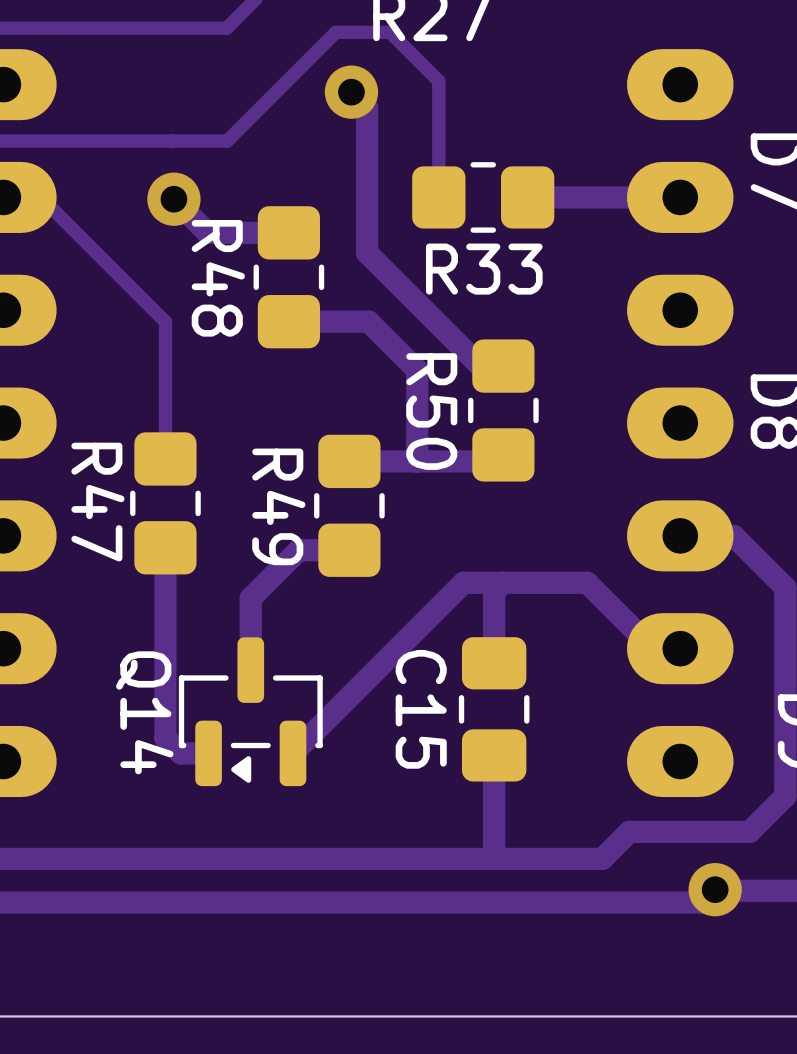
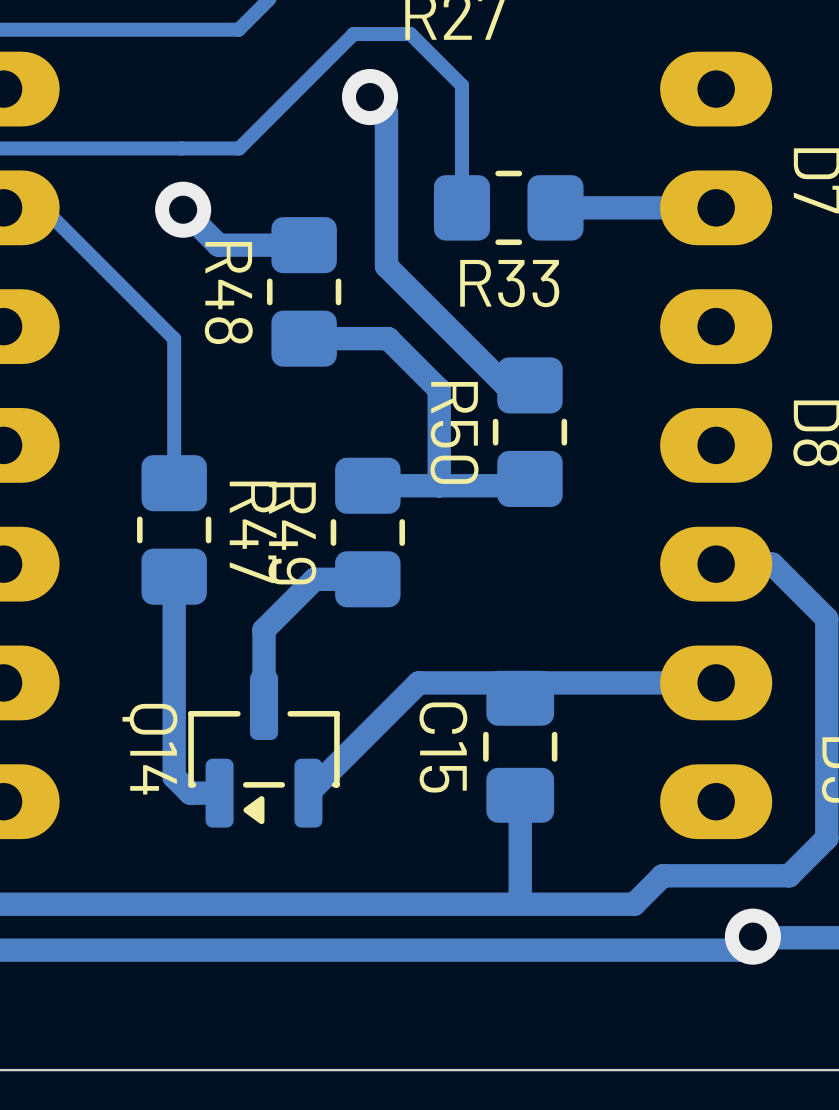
R47 name position: R47 (97, 502) -> R47 (253, 532)
track: (503, 582) (494, 592) (494, 663) -> none
track: (653, 648) (587, 582) (463, 582) (397, 648) -> (687, 682) (418, 682)

